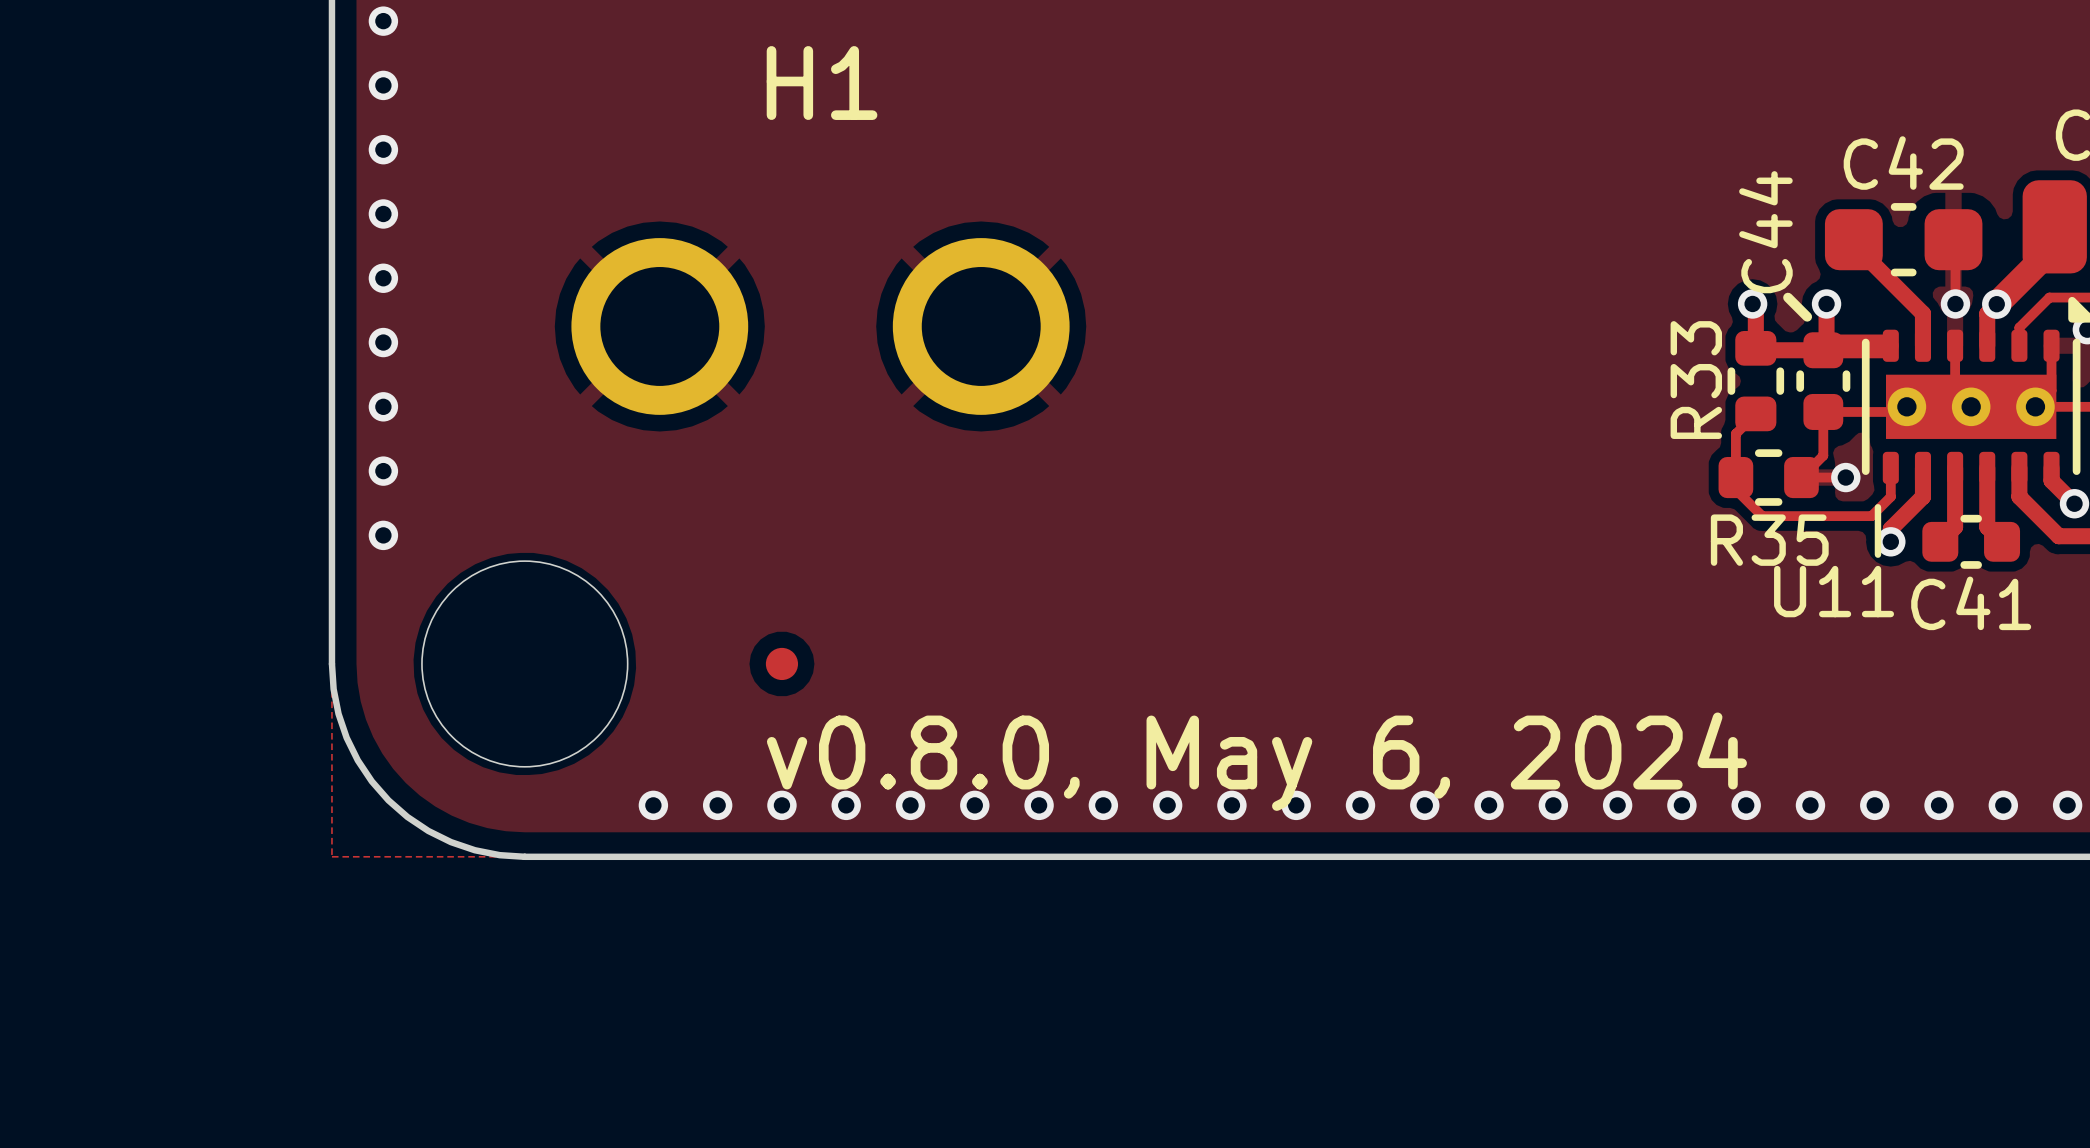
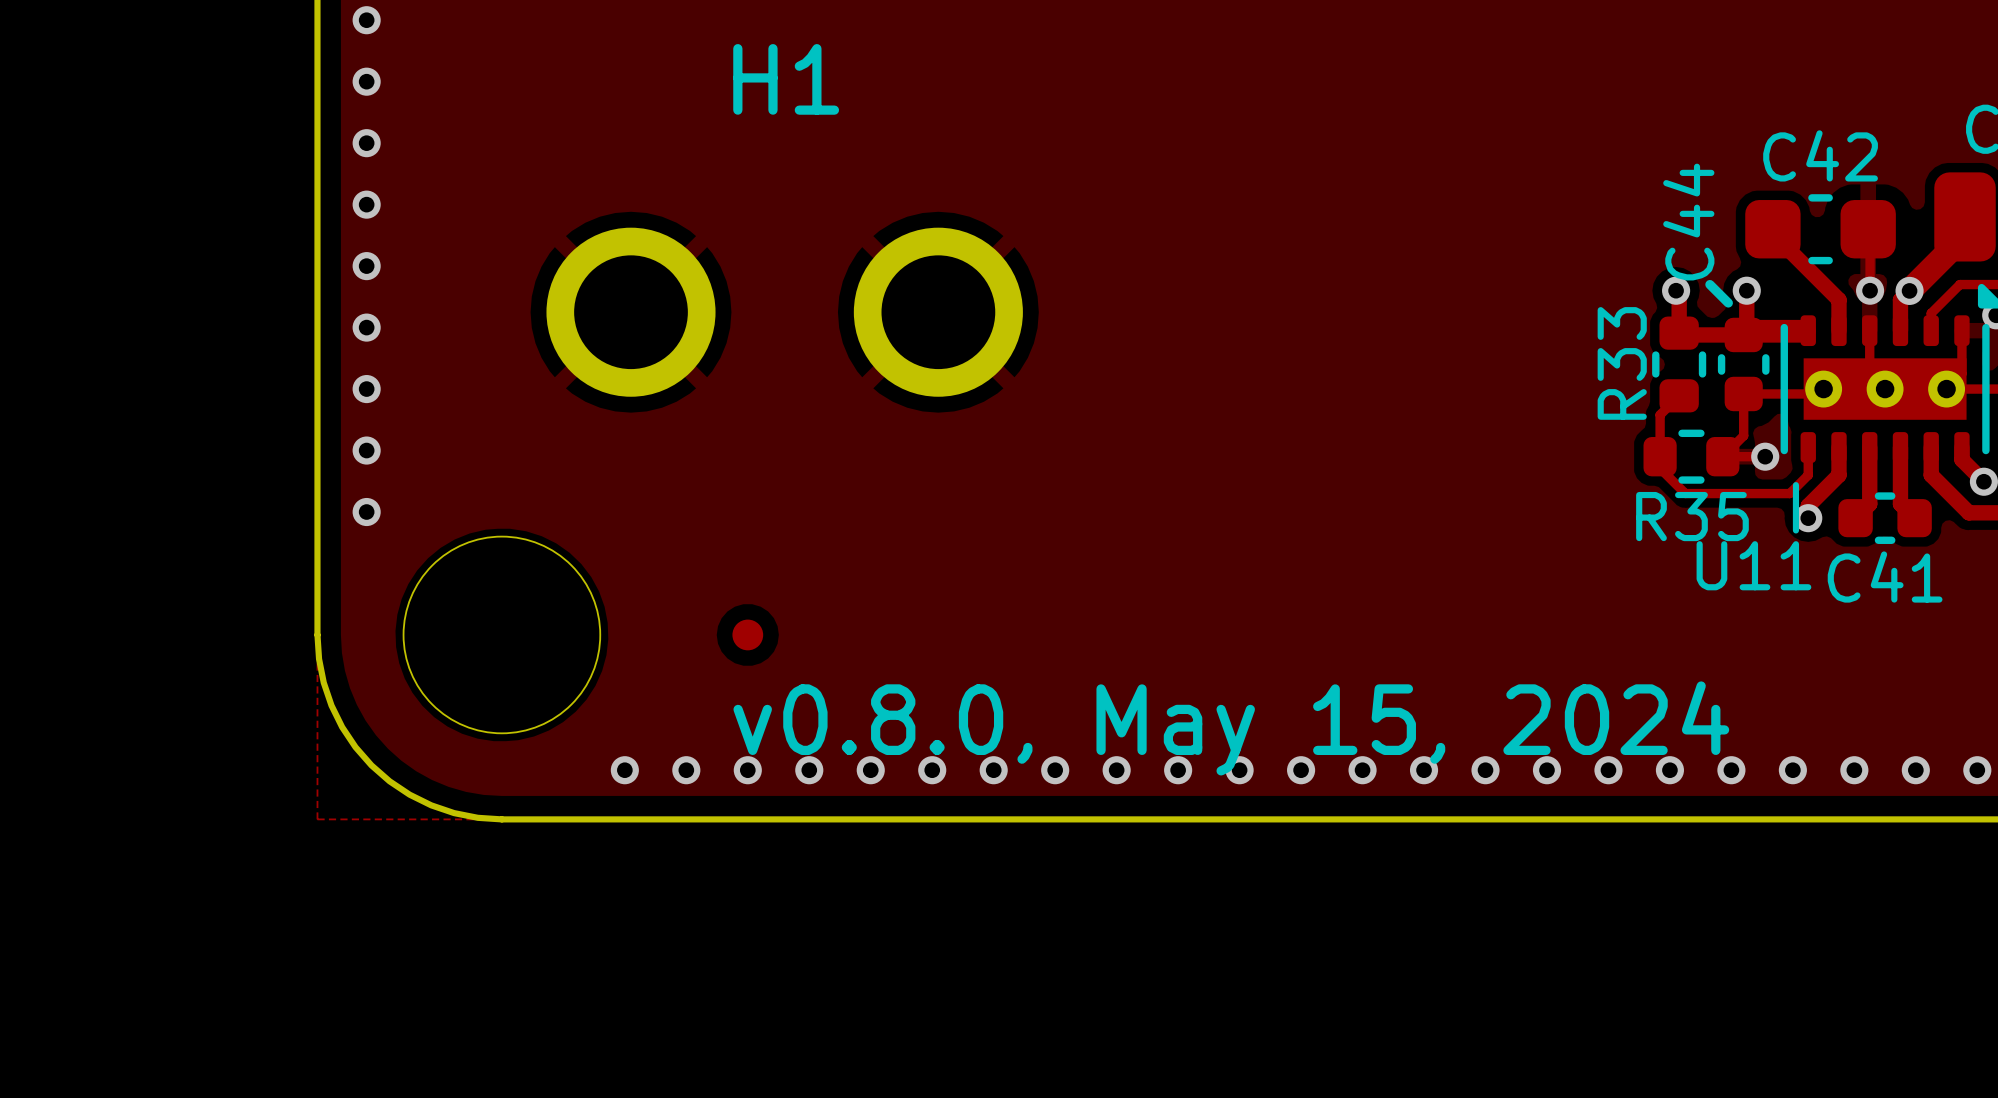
text: v0.8.0, May 6, 2024 (1256, 761) -> v0.8.0, May 15, 2024 (1231, 728)

